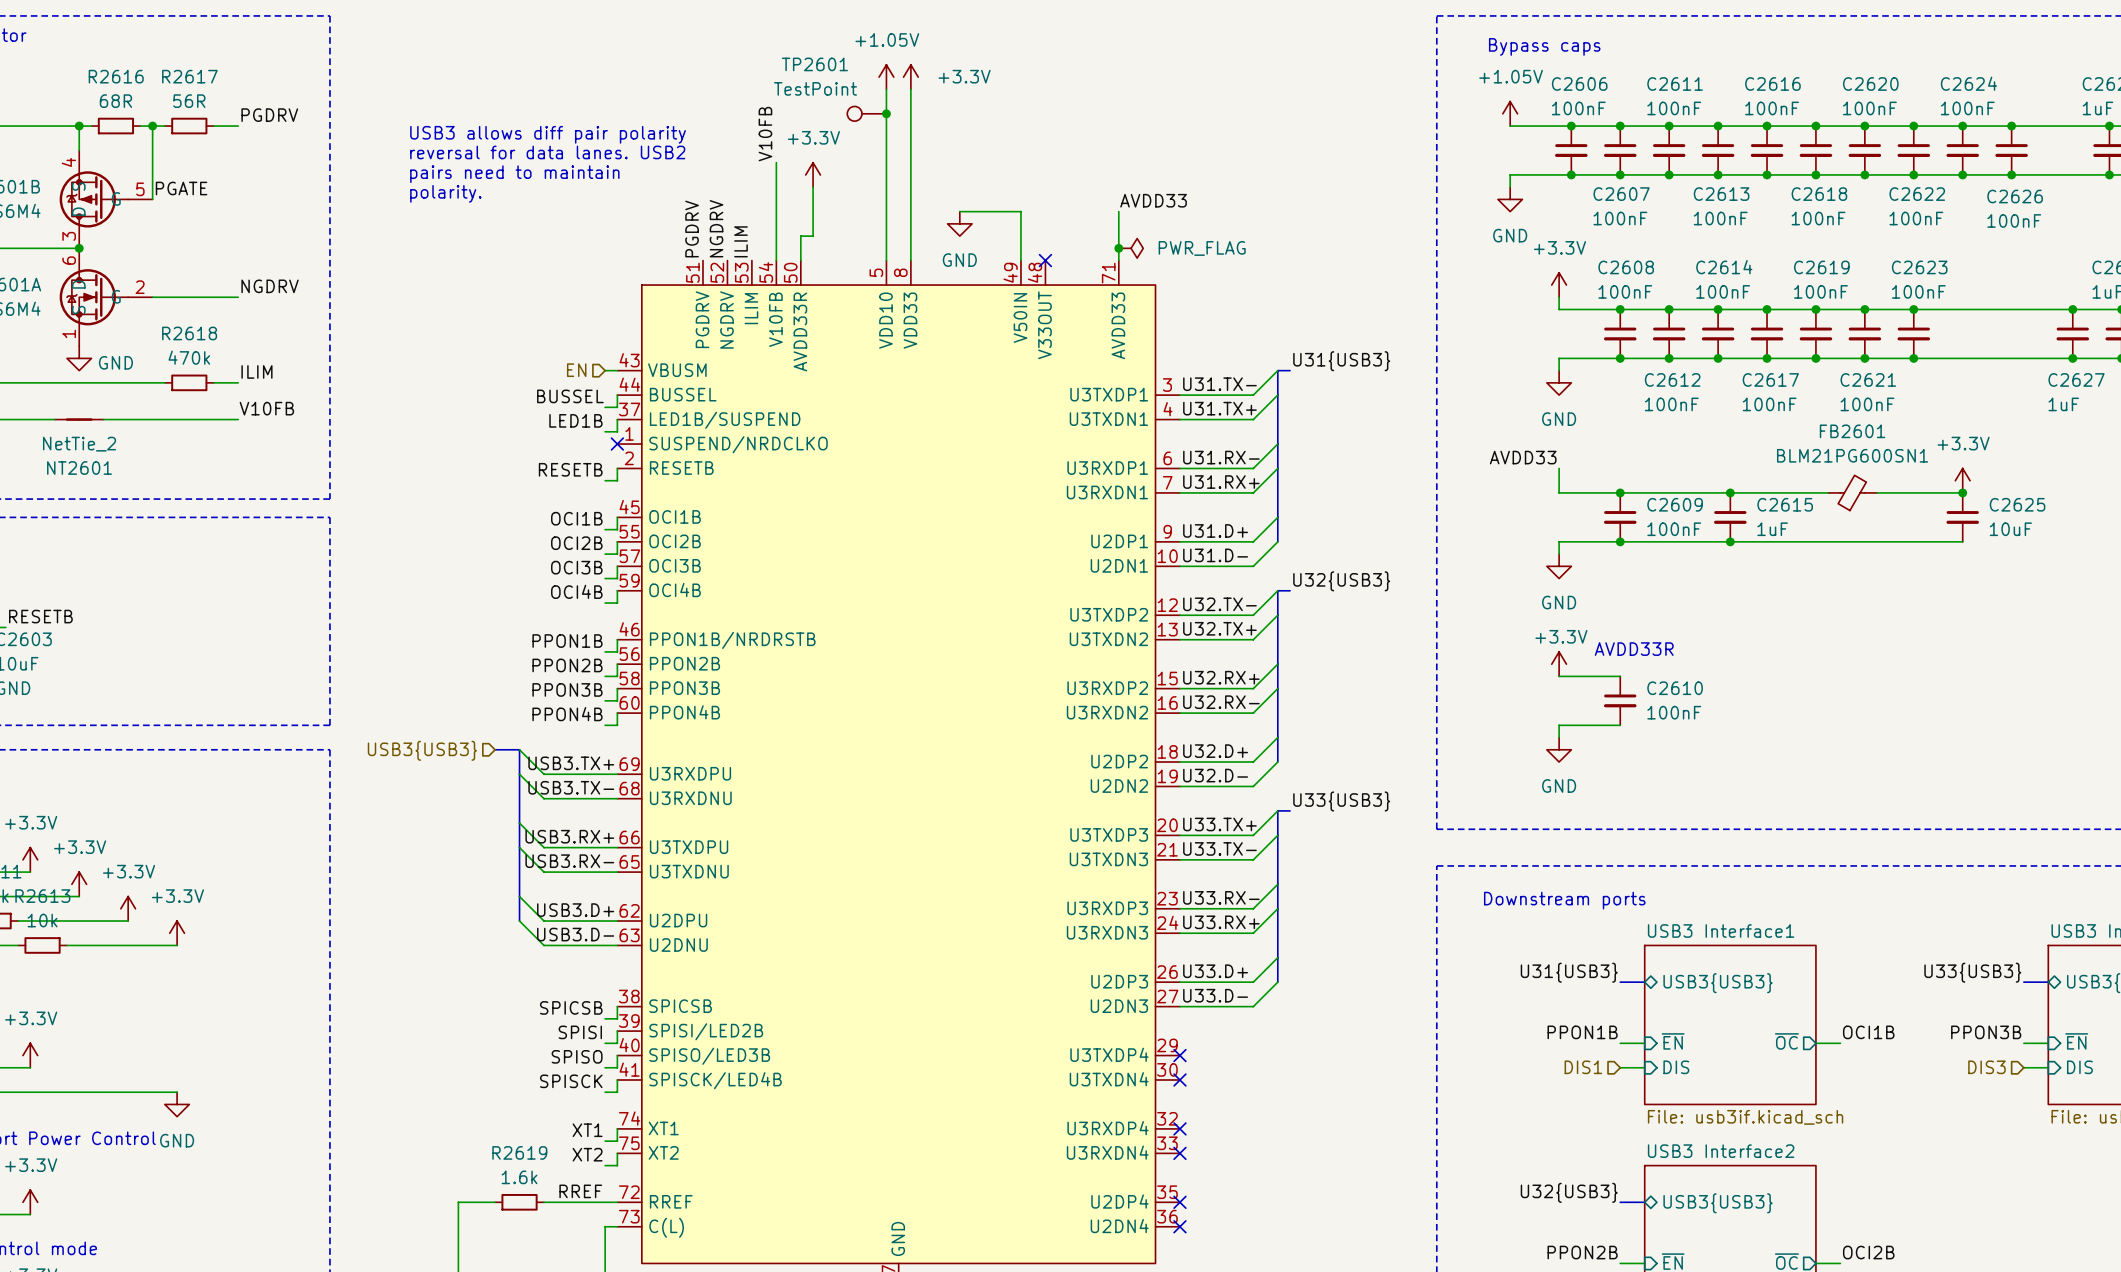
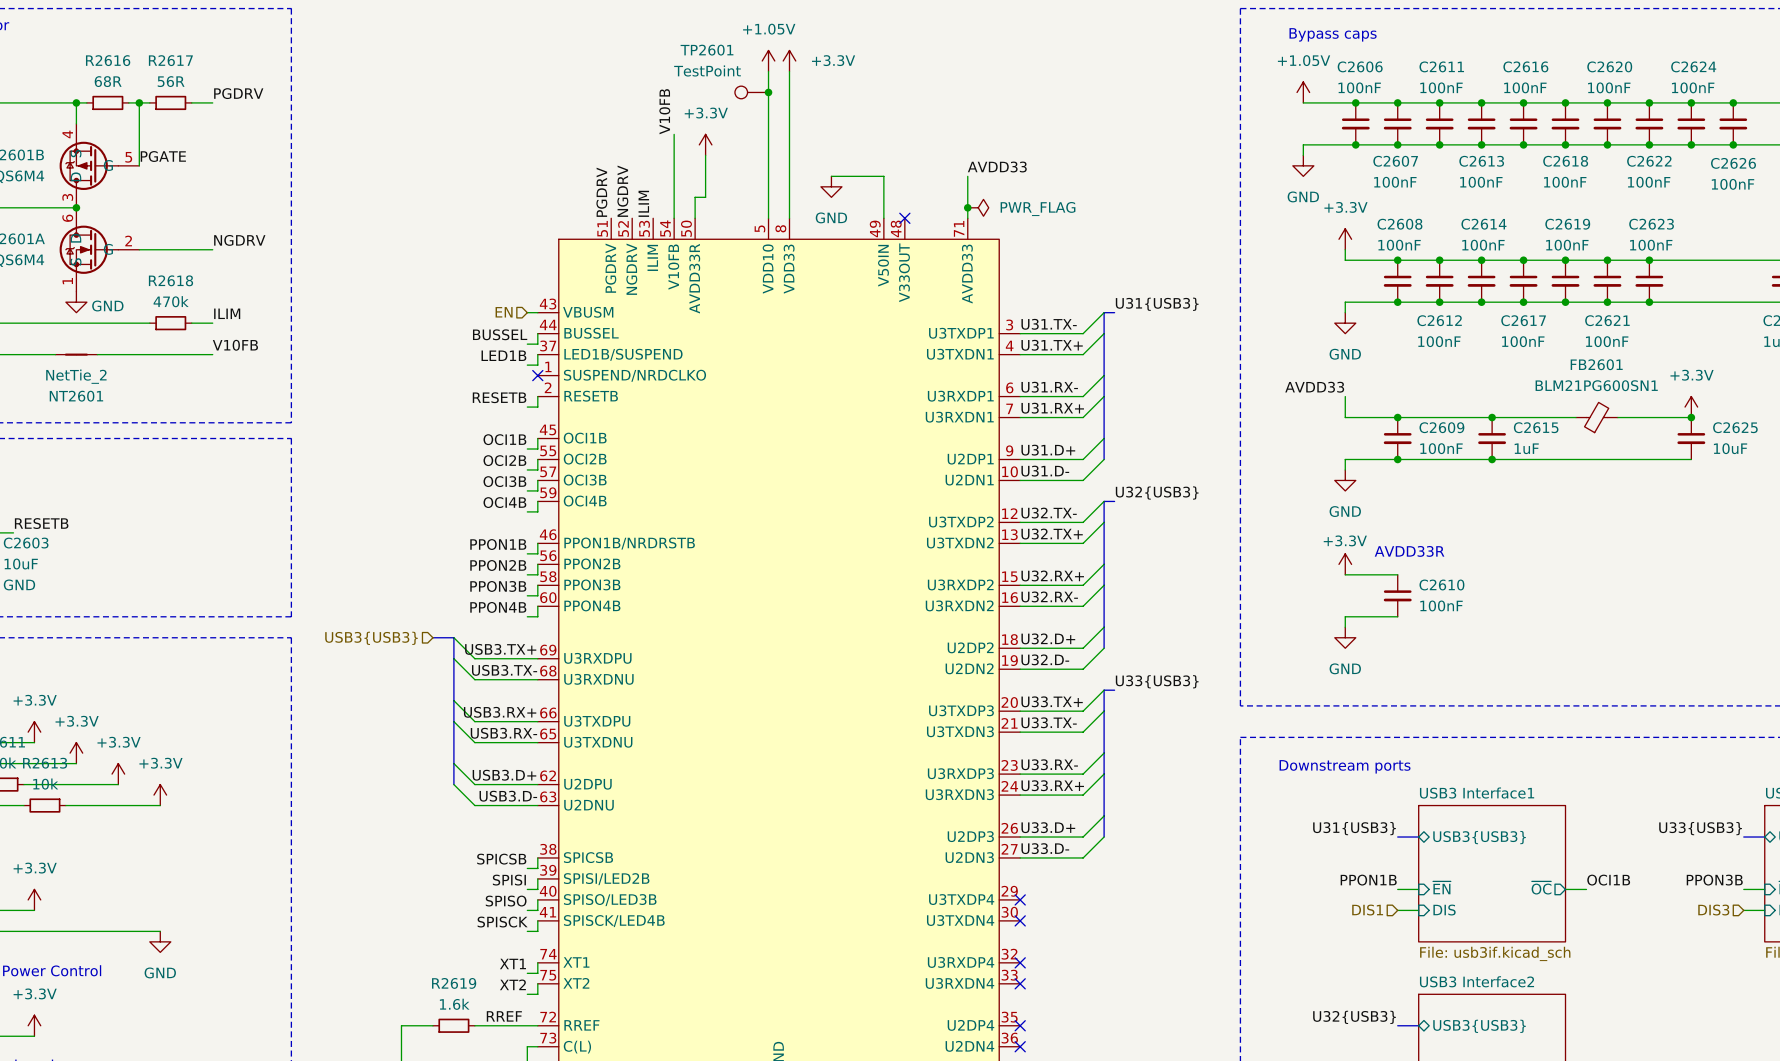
text: USB3 allows diff pair polarity (548, 134) -> none
text: reversal for data lanes. USB2 (547, 152) -> none
text: pairs need to maintain (514, 174) -> none
text: polarity. (445, 193) -> none

